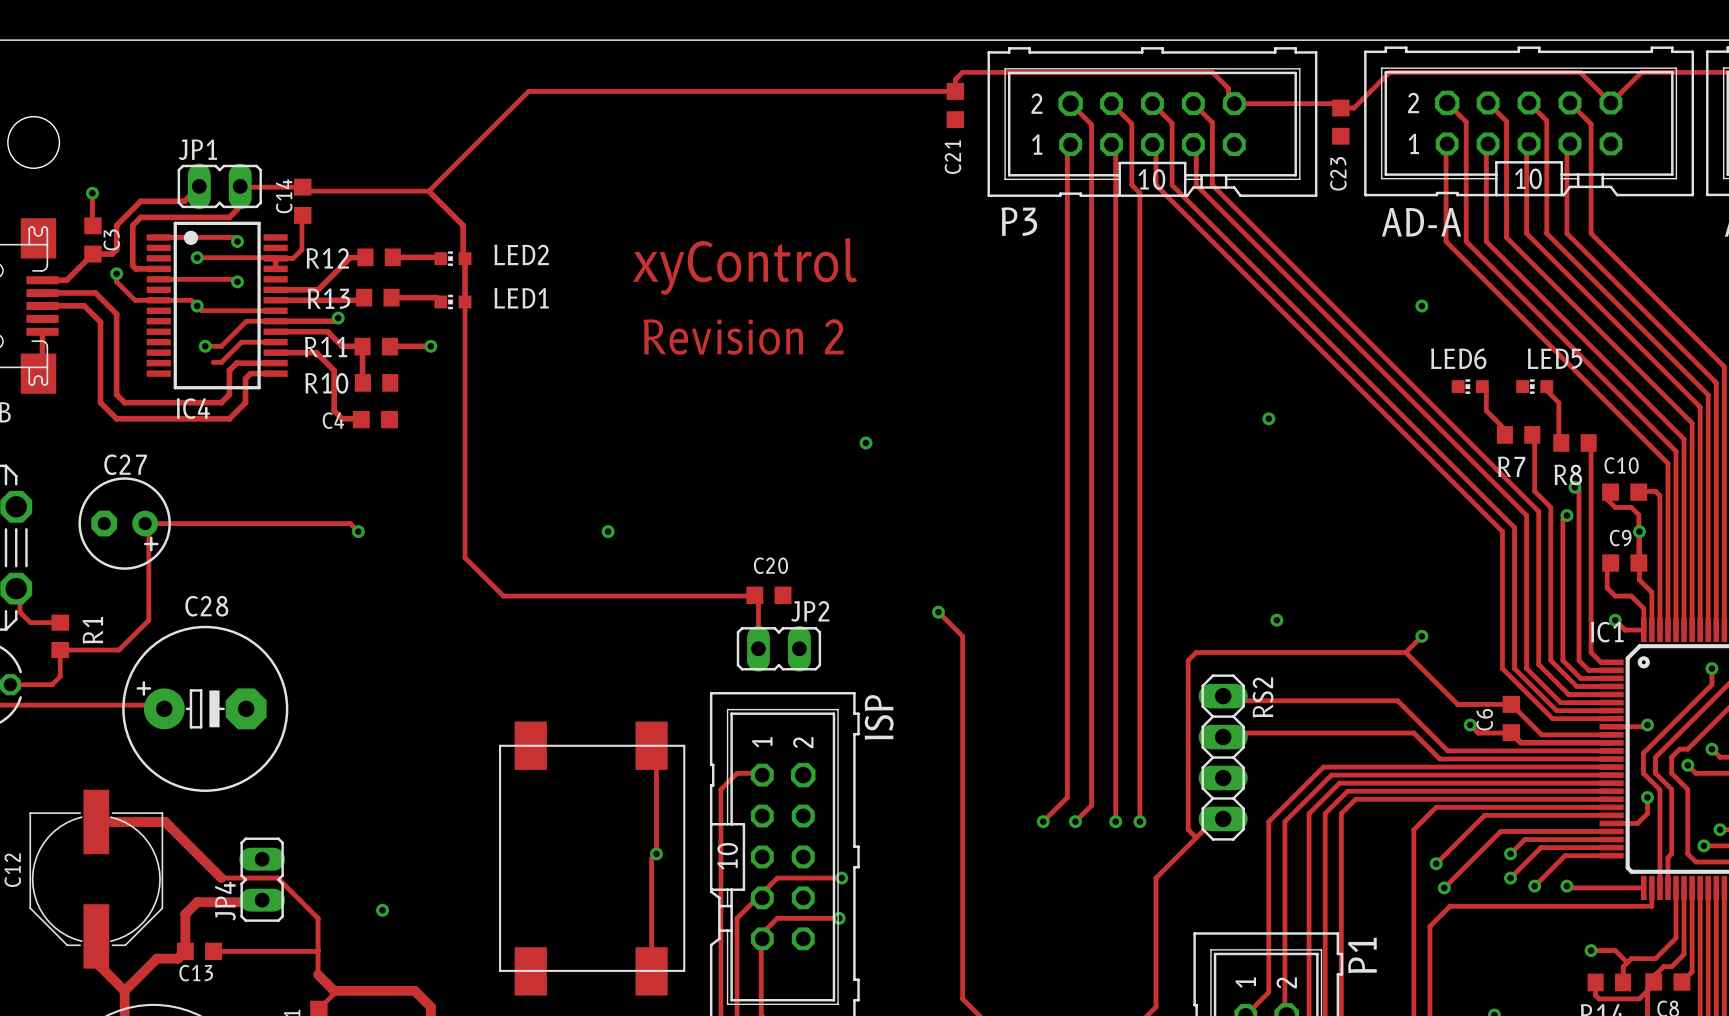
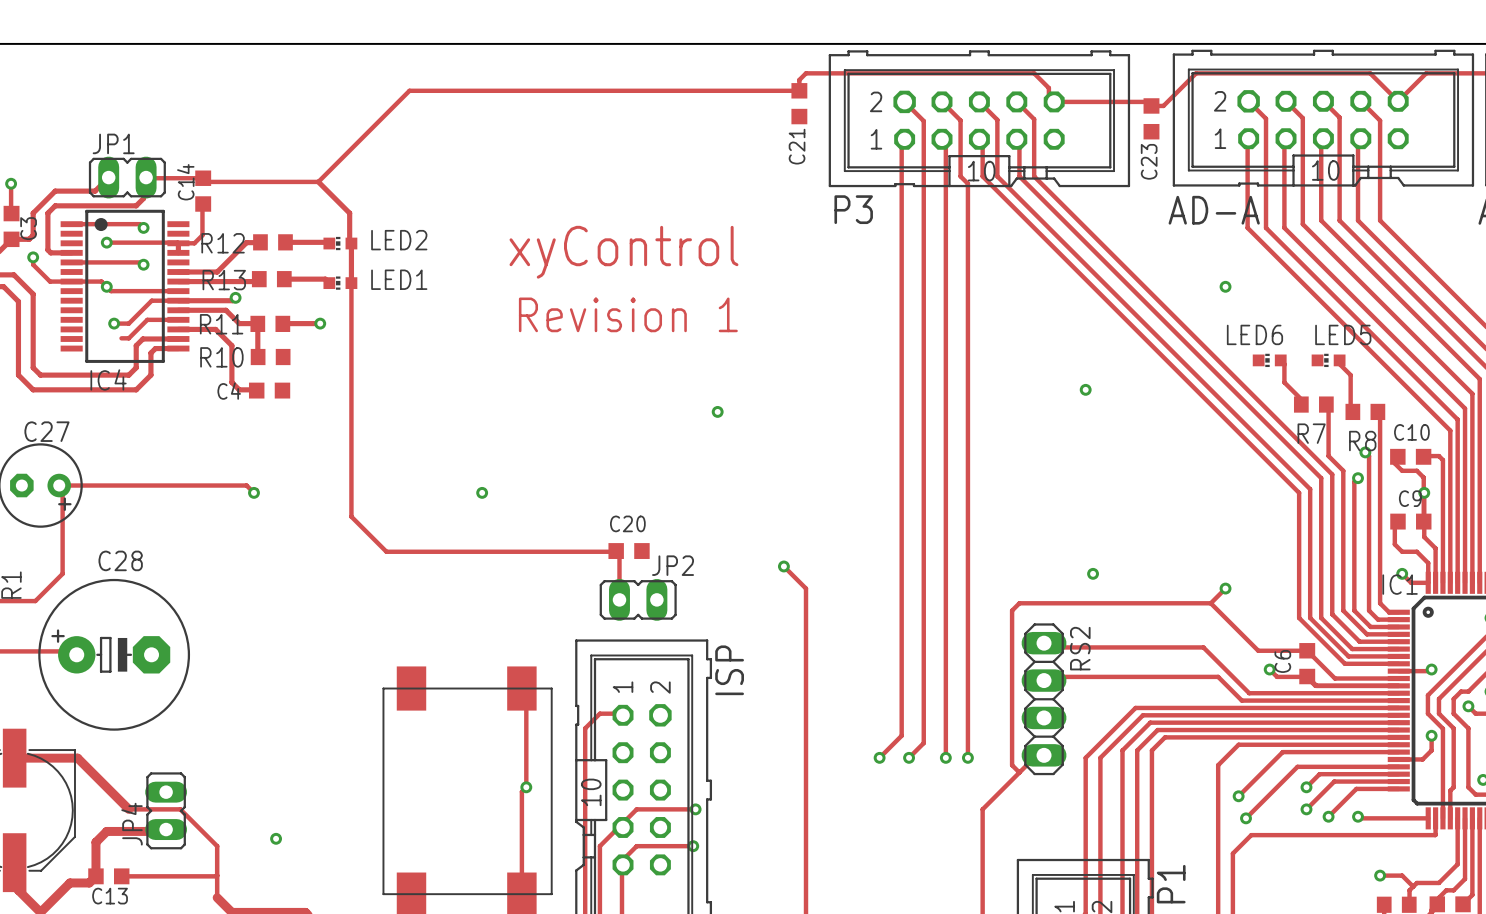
text: Revision 2 (743, 337) -> Revision 1 (628, 314)

